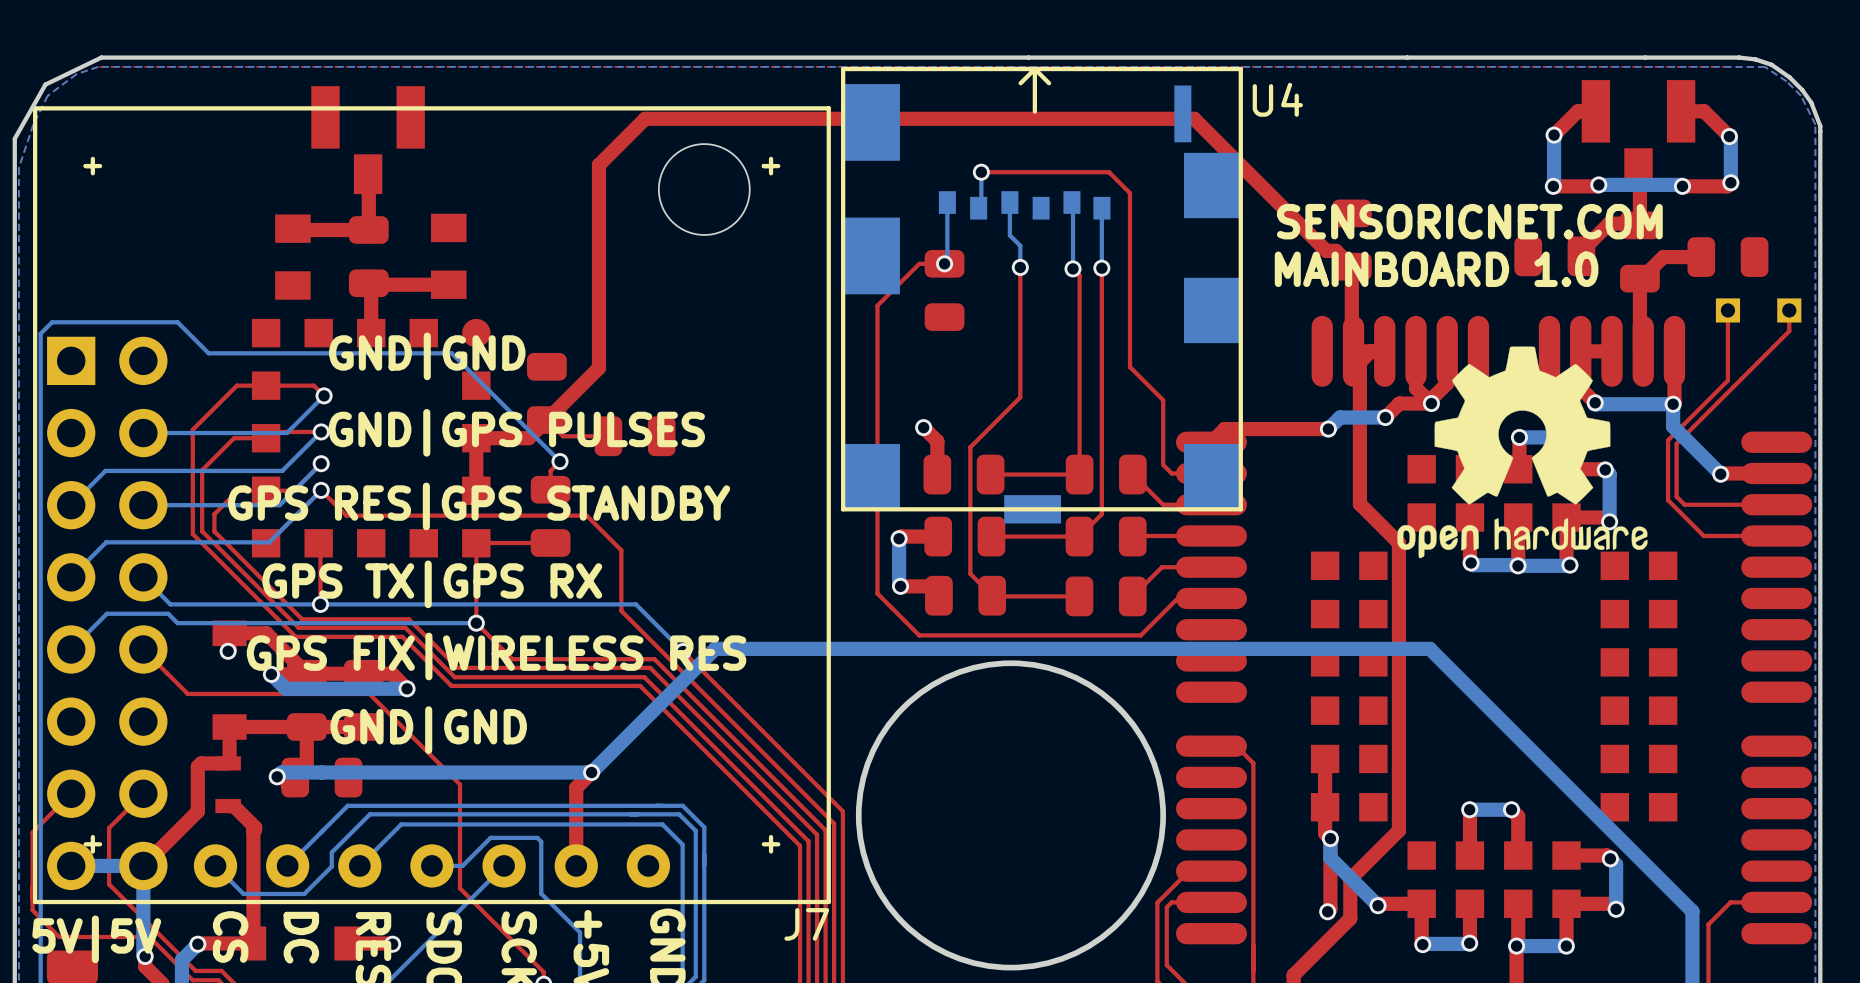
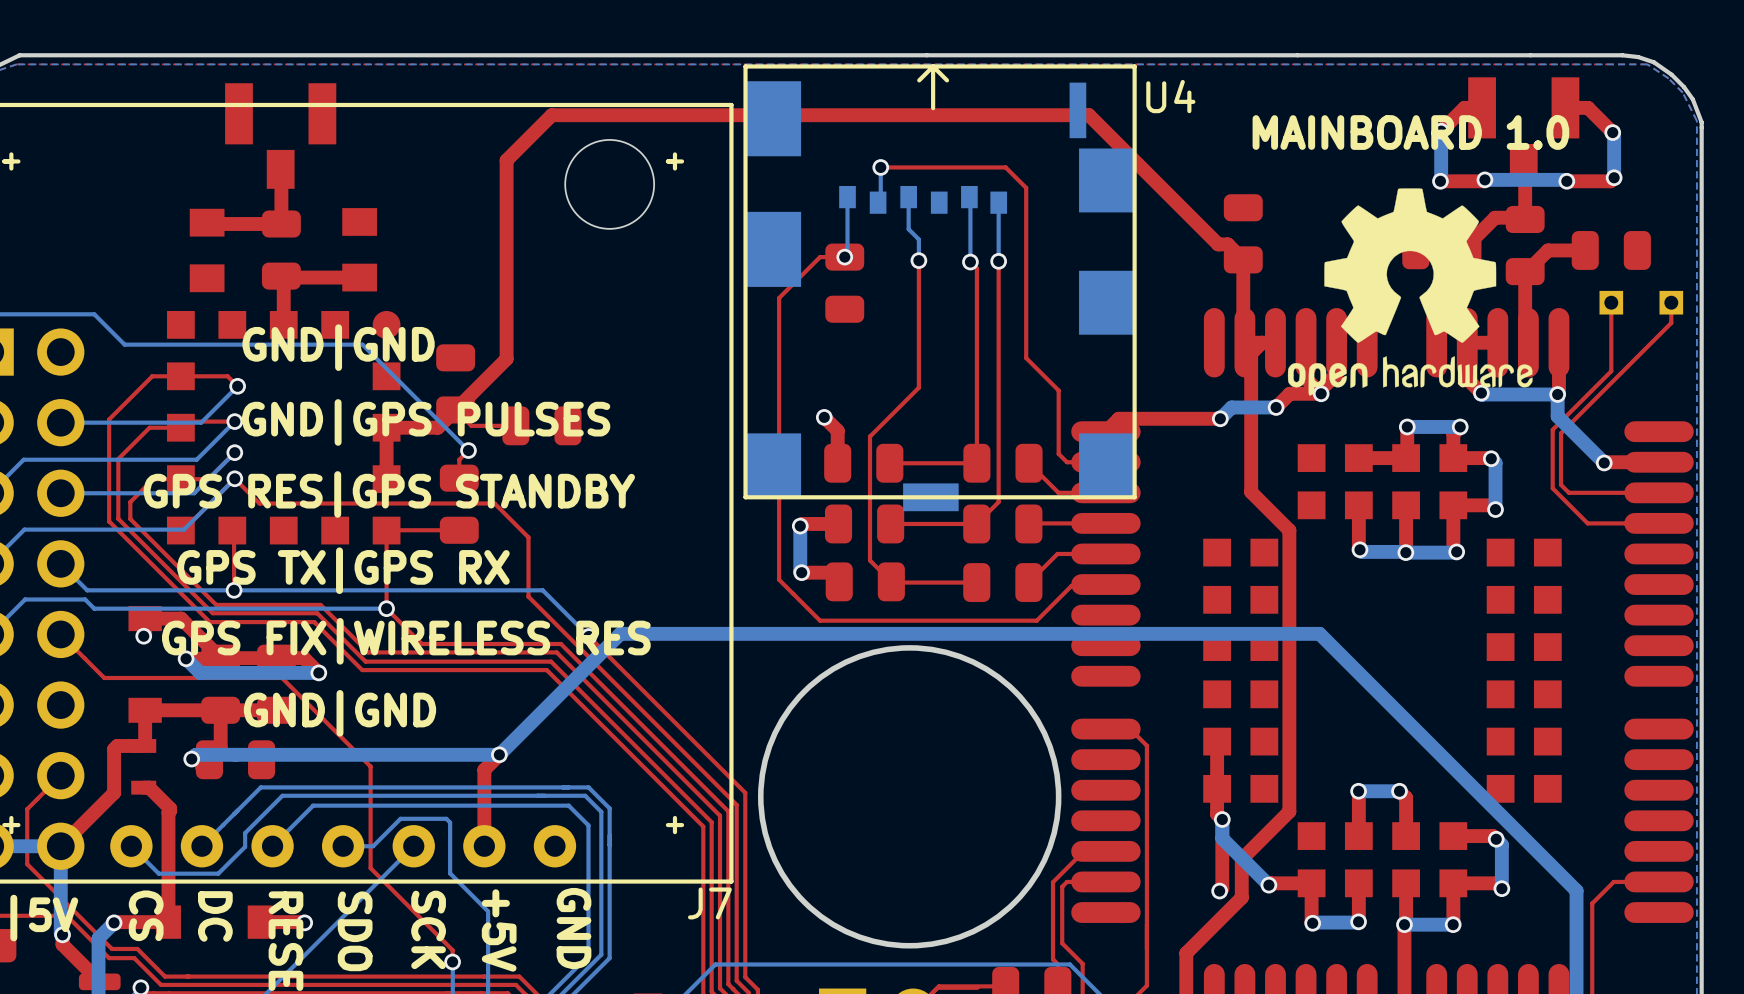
text: SENSORICNET.COM (1469, 221) -> none
text position: MAINBOARD 1.0 (1436, 269) -> MAINBOARD 1.0 (1410, 132)
drawing position: (1522, 452) -> (1410, 291)

